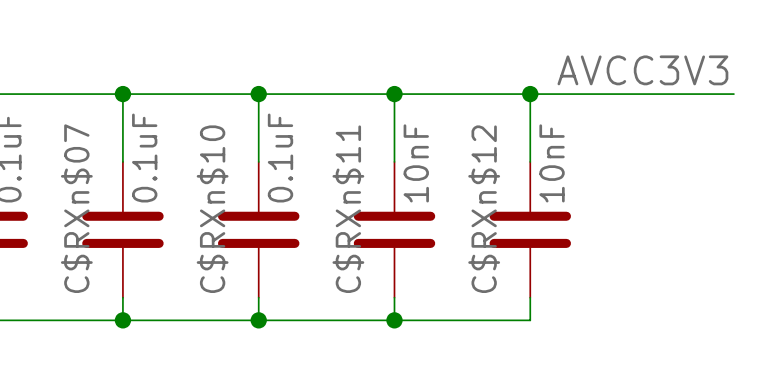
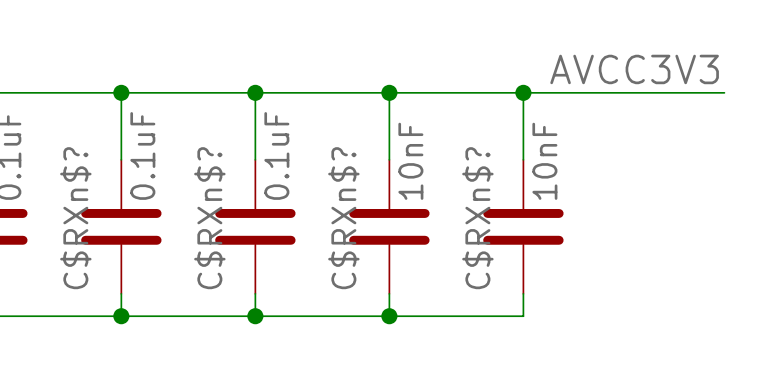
C$RXn$07 name: C$RXn$07 (76, 208) -> C$RXn$? (75, 218)
C$RXn$10 name: C$RXn$10 (212, 209) -> C$RXn$? (209, 218)
C$RXn$11 name: C$RXn$11 (348, 209) -> C$RXn$? (343, 218)
C$RXn$12 name: C$RXn$12 (484, 209) -> C$RXn$? (477, 218)

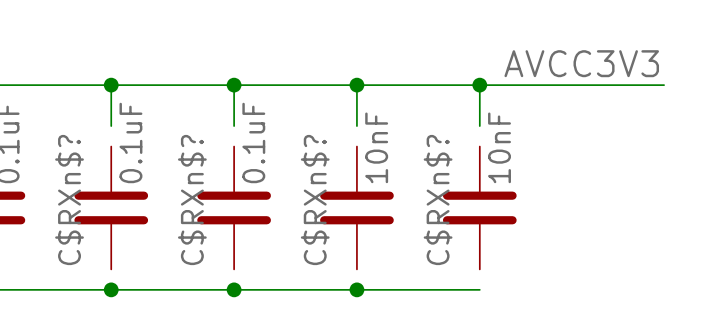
wire: (121, 137) (121, 159) -> none
wire: (255, 137) (255, 159) -> none
wire: (389, 137) (389, 159) -> none
wire: (523, 137) (523, 159) -> none
wire: (121, 293) (121, 316) -> none
wire: (255, 293) (255, 316) -> none
wire: (389, 293) (389, 316) -> none
wire: (523, 293) (523, 316) -> none

